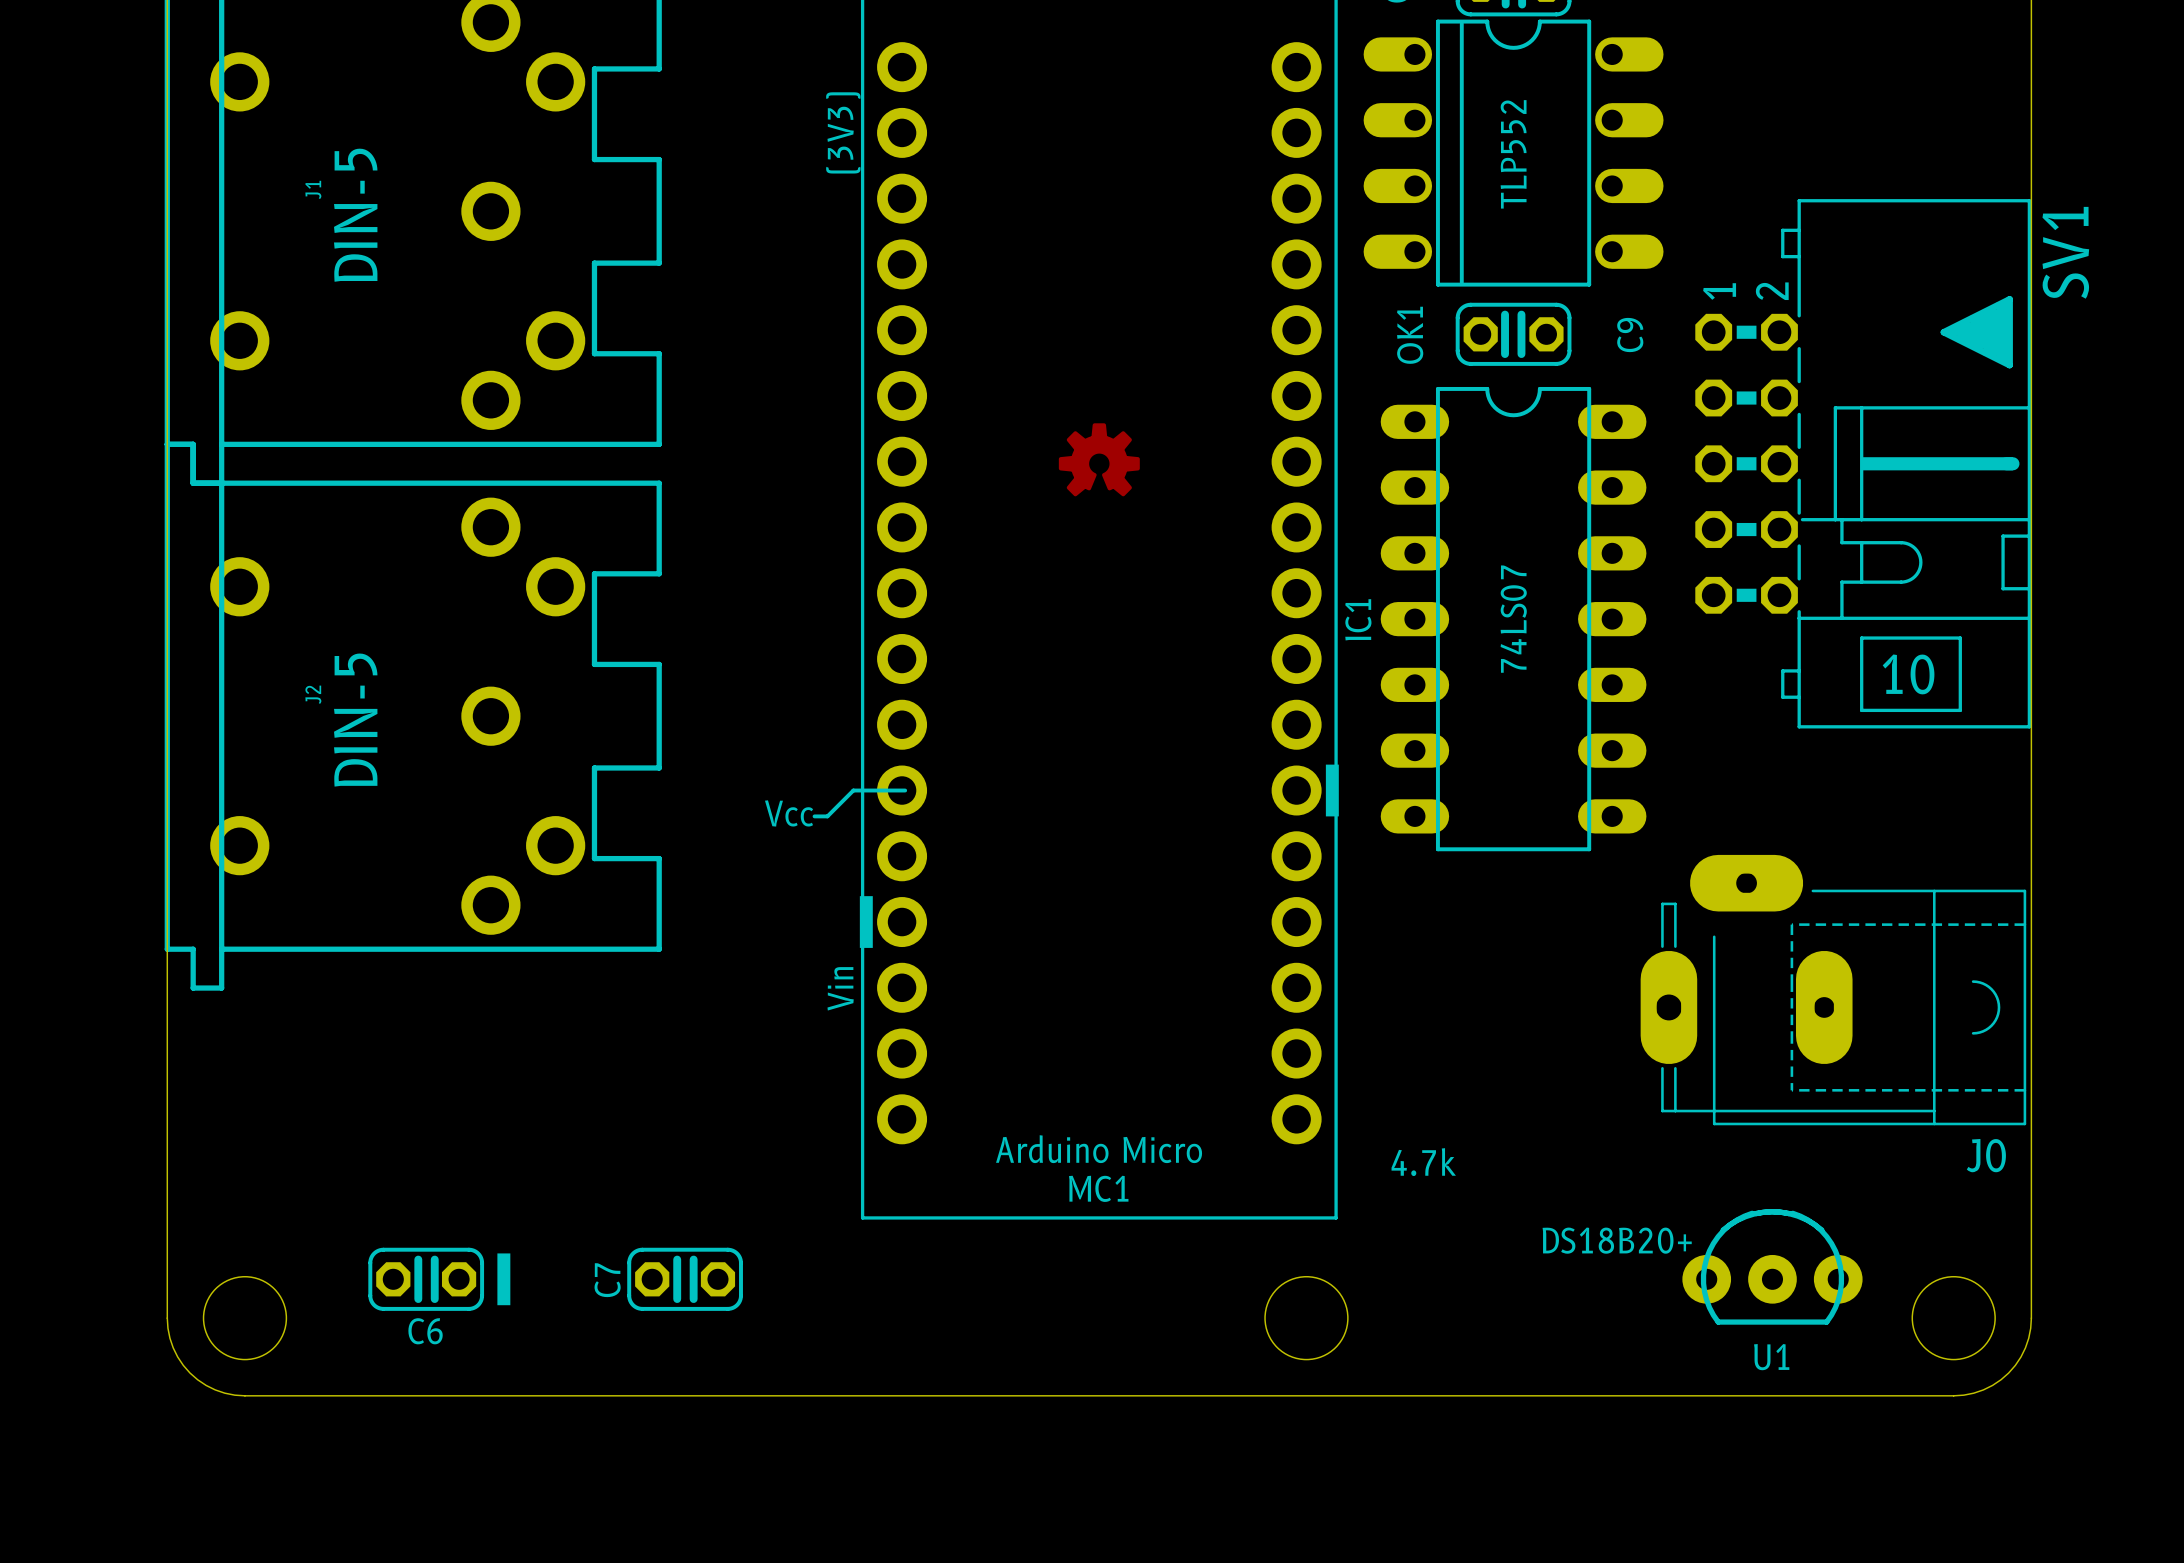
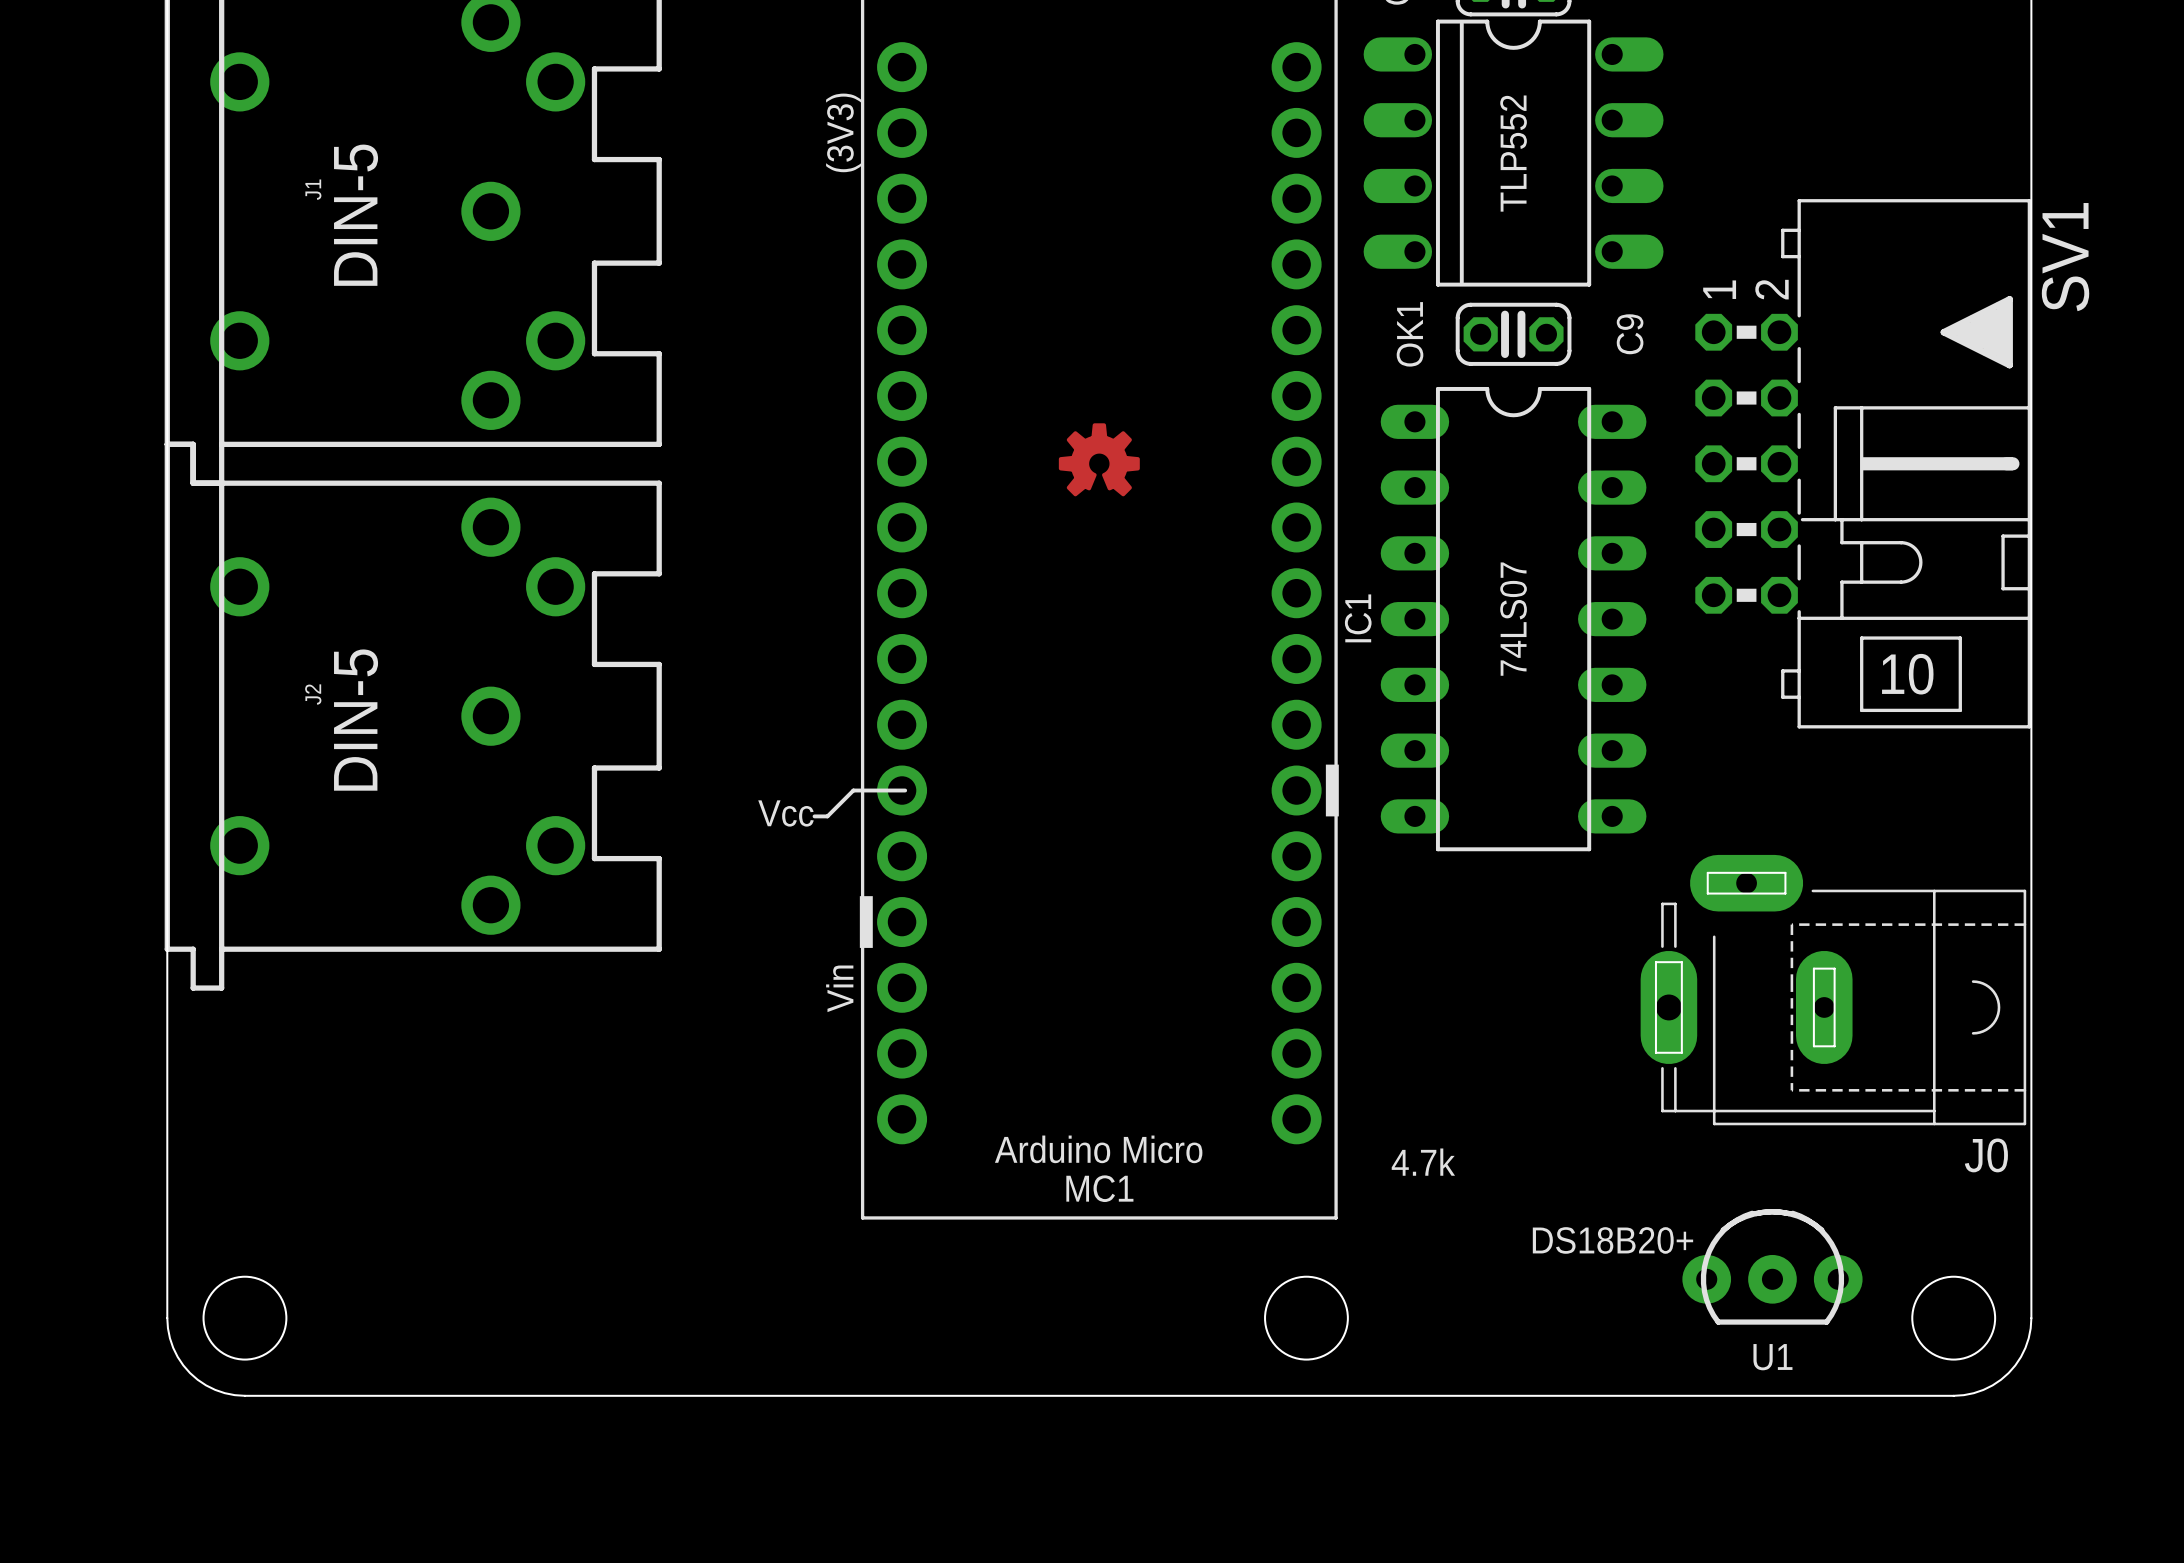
drawing: [497, 1253, 511, 1306] -> none
C6: (426, 1279) -> none
C7: (685, 1279) -> none

